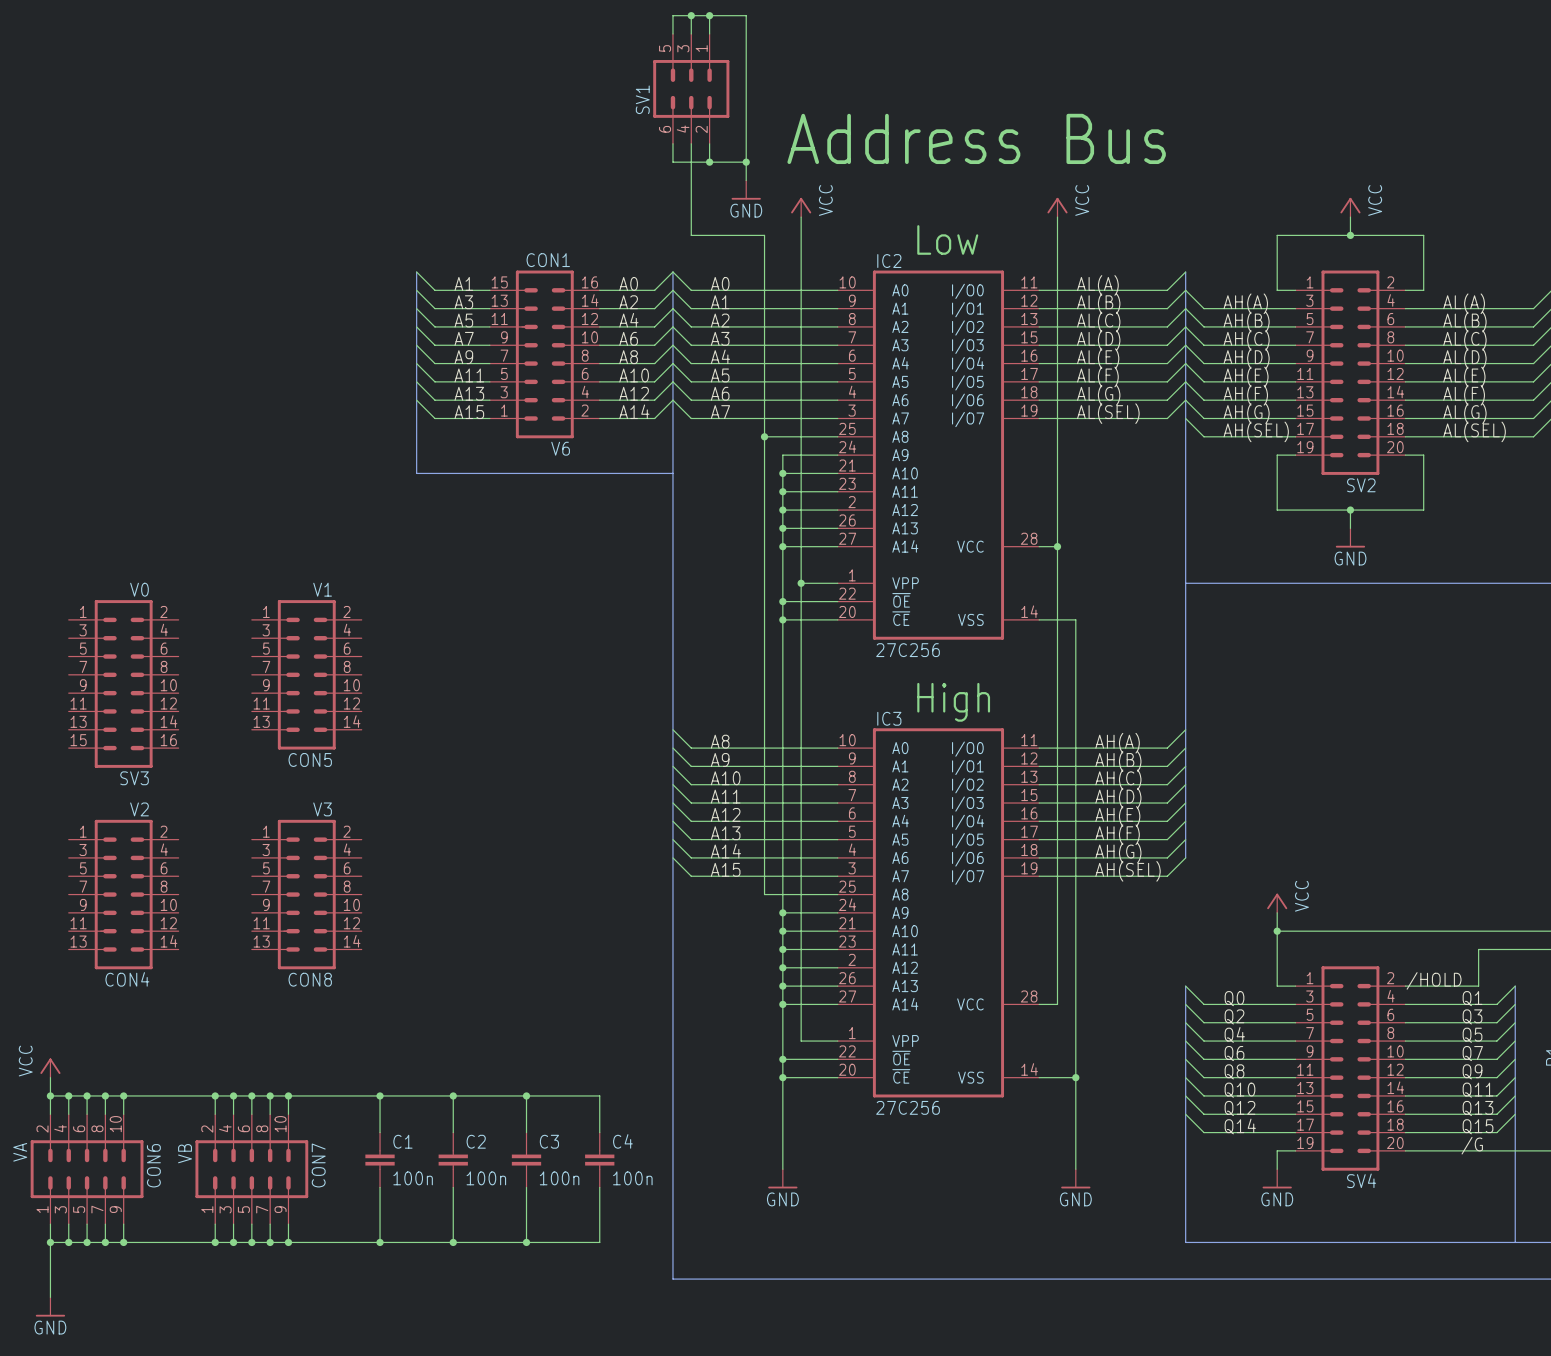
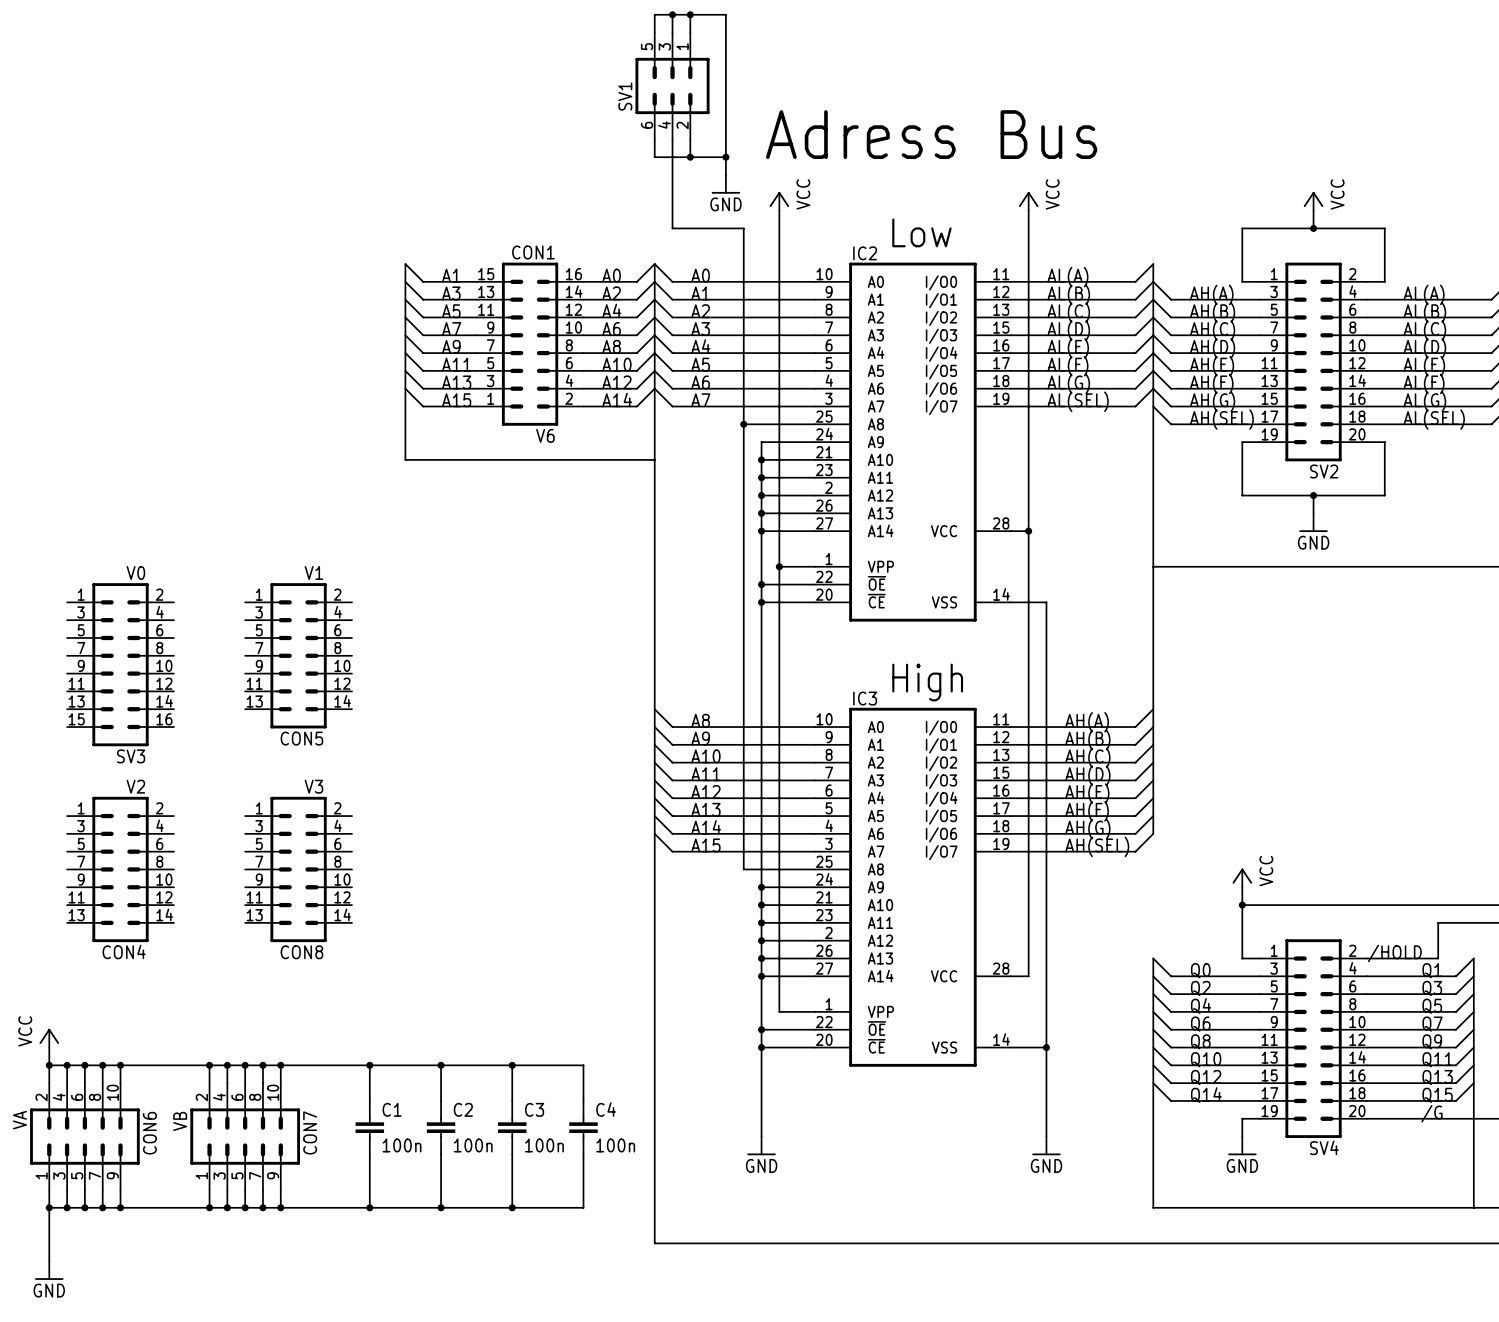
text: Address Bus (976, 138) -> Adress Bus (931, 134)
IC2 value: 27C256 (908, 650) -> none
IC3 value: 27C256 (908, 1107) -> none

